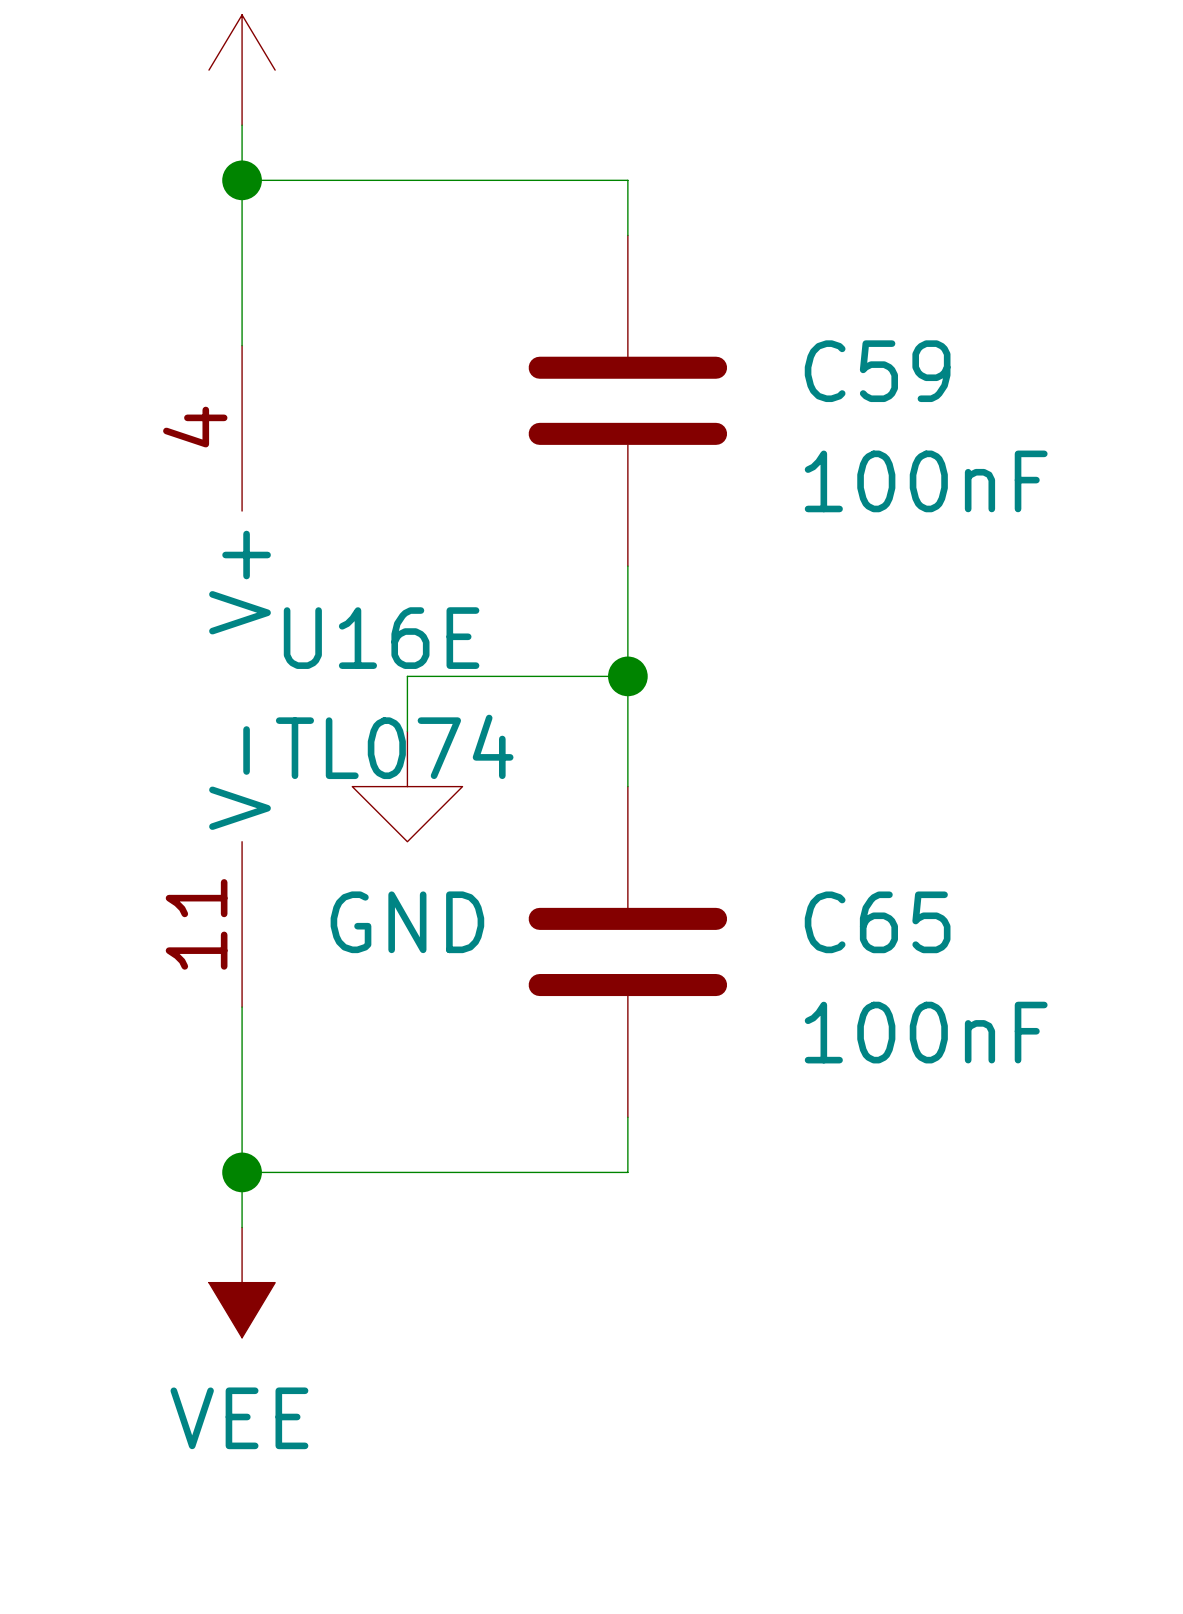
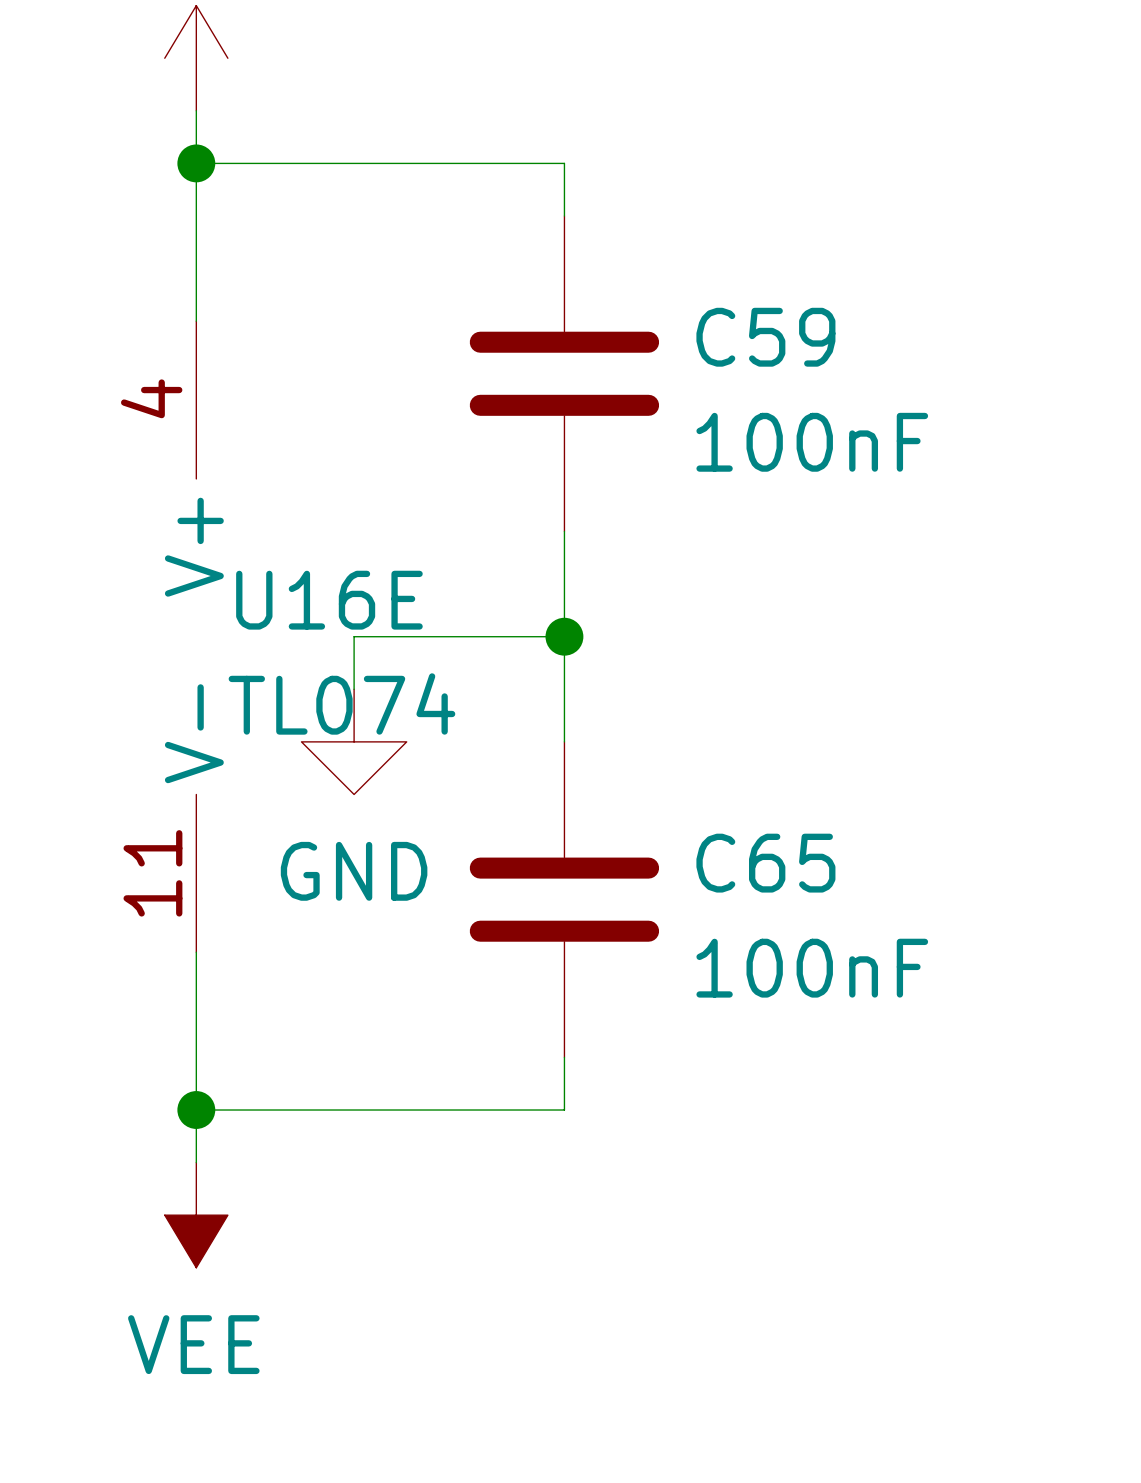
C59 name position: C59 (877, 371) -> C59 (765, 337)
C59 value position: 100nF (926, 481) -> 100nF (812, 442)
C65 name position: C65 (877, 922) -> C65 (765, 863)
C65 value position: 100nF (926, 1032) -> 100nF (812, 968)

